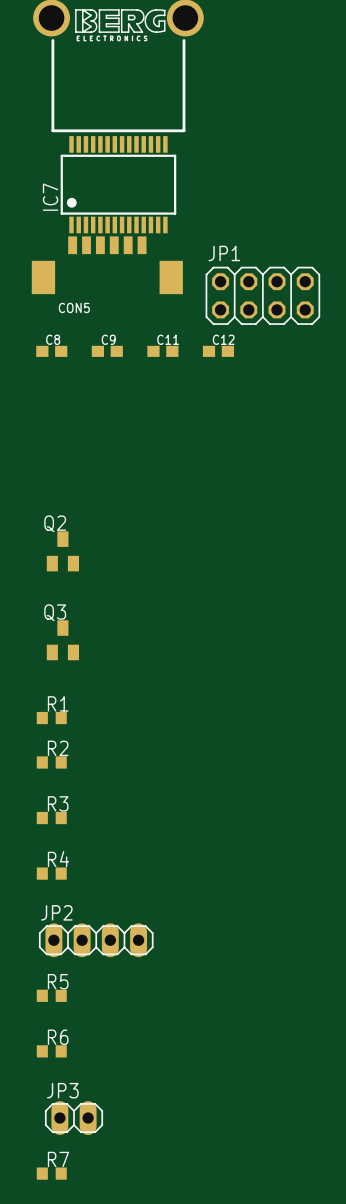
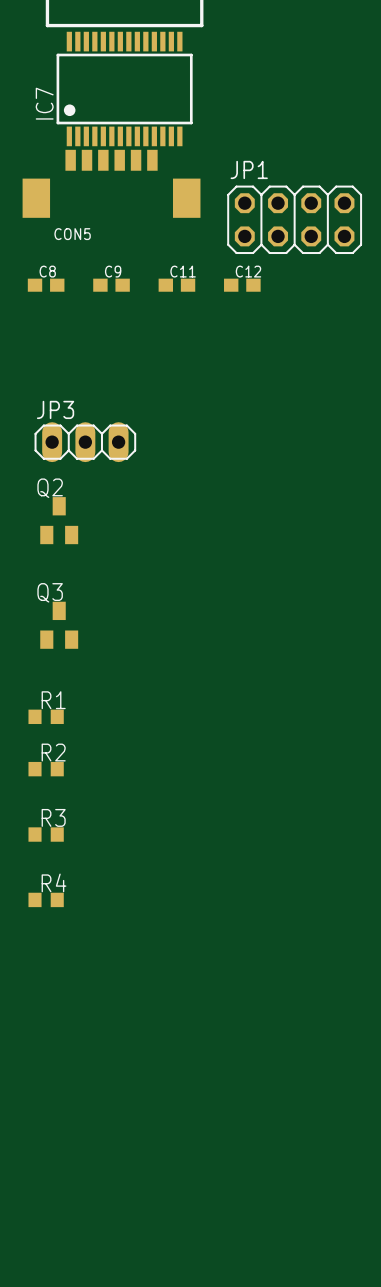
JP2: (96, 940) -> none
R5: (51, 995) -> none
R6: (51, 1051) -> none
JP3 footprint: [44, 1101, 104, 1135] -> [34, 422, 137, 463]
R7: (51, 1173) -> none

